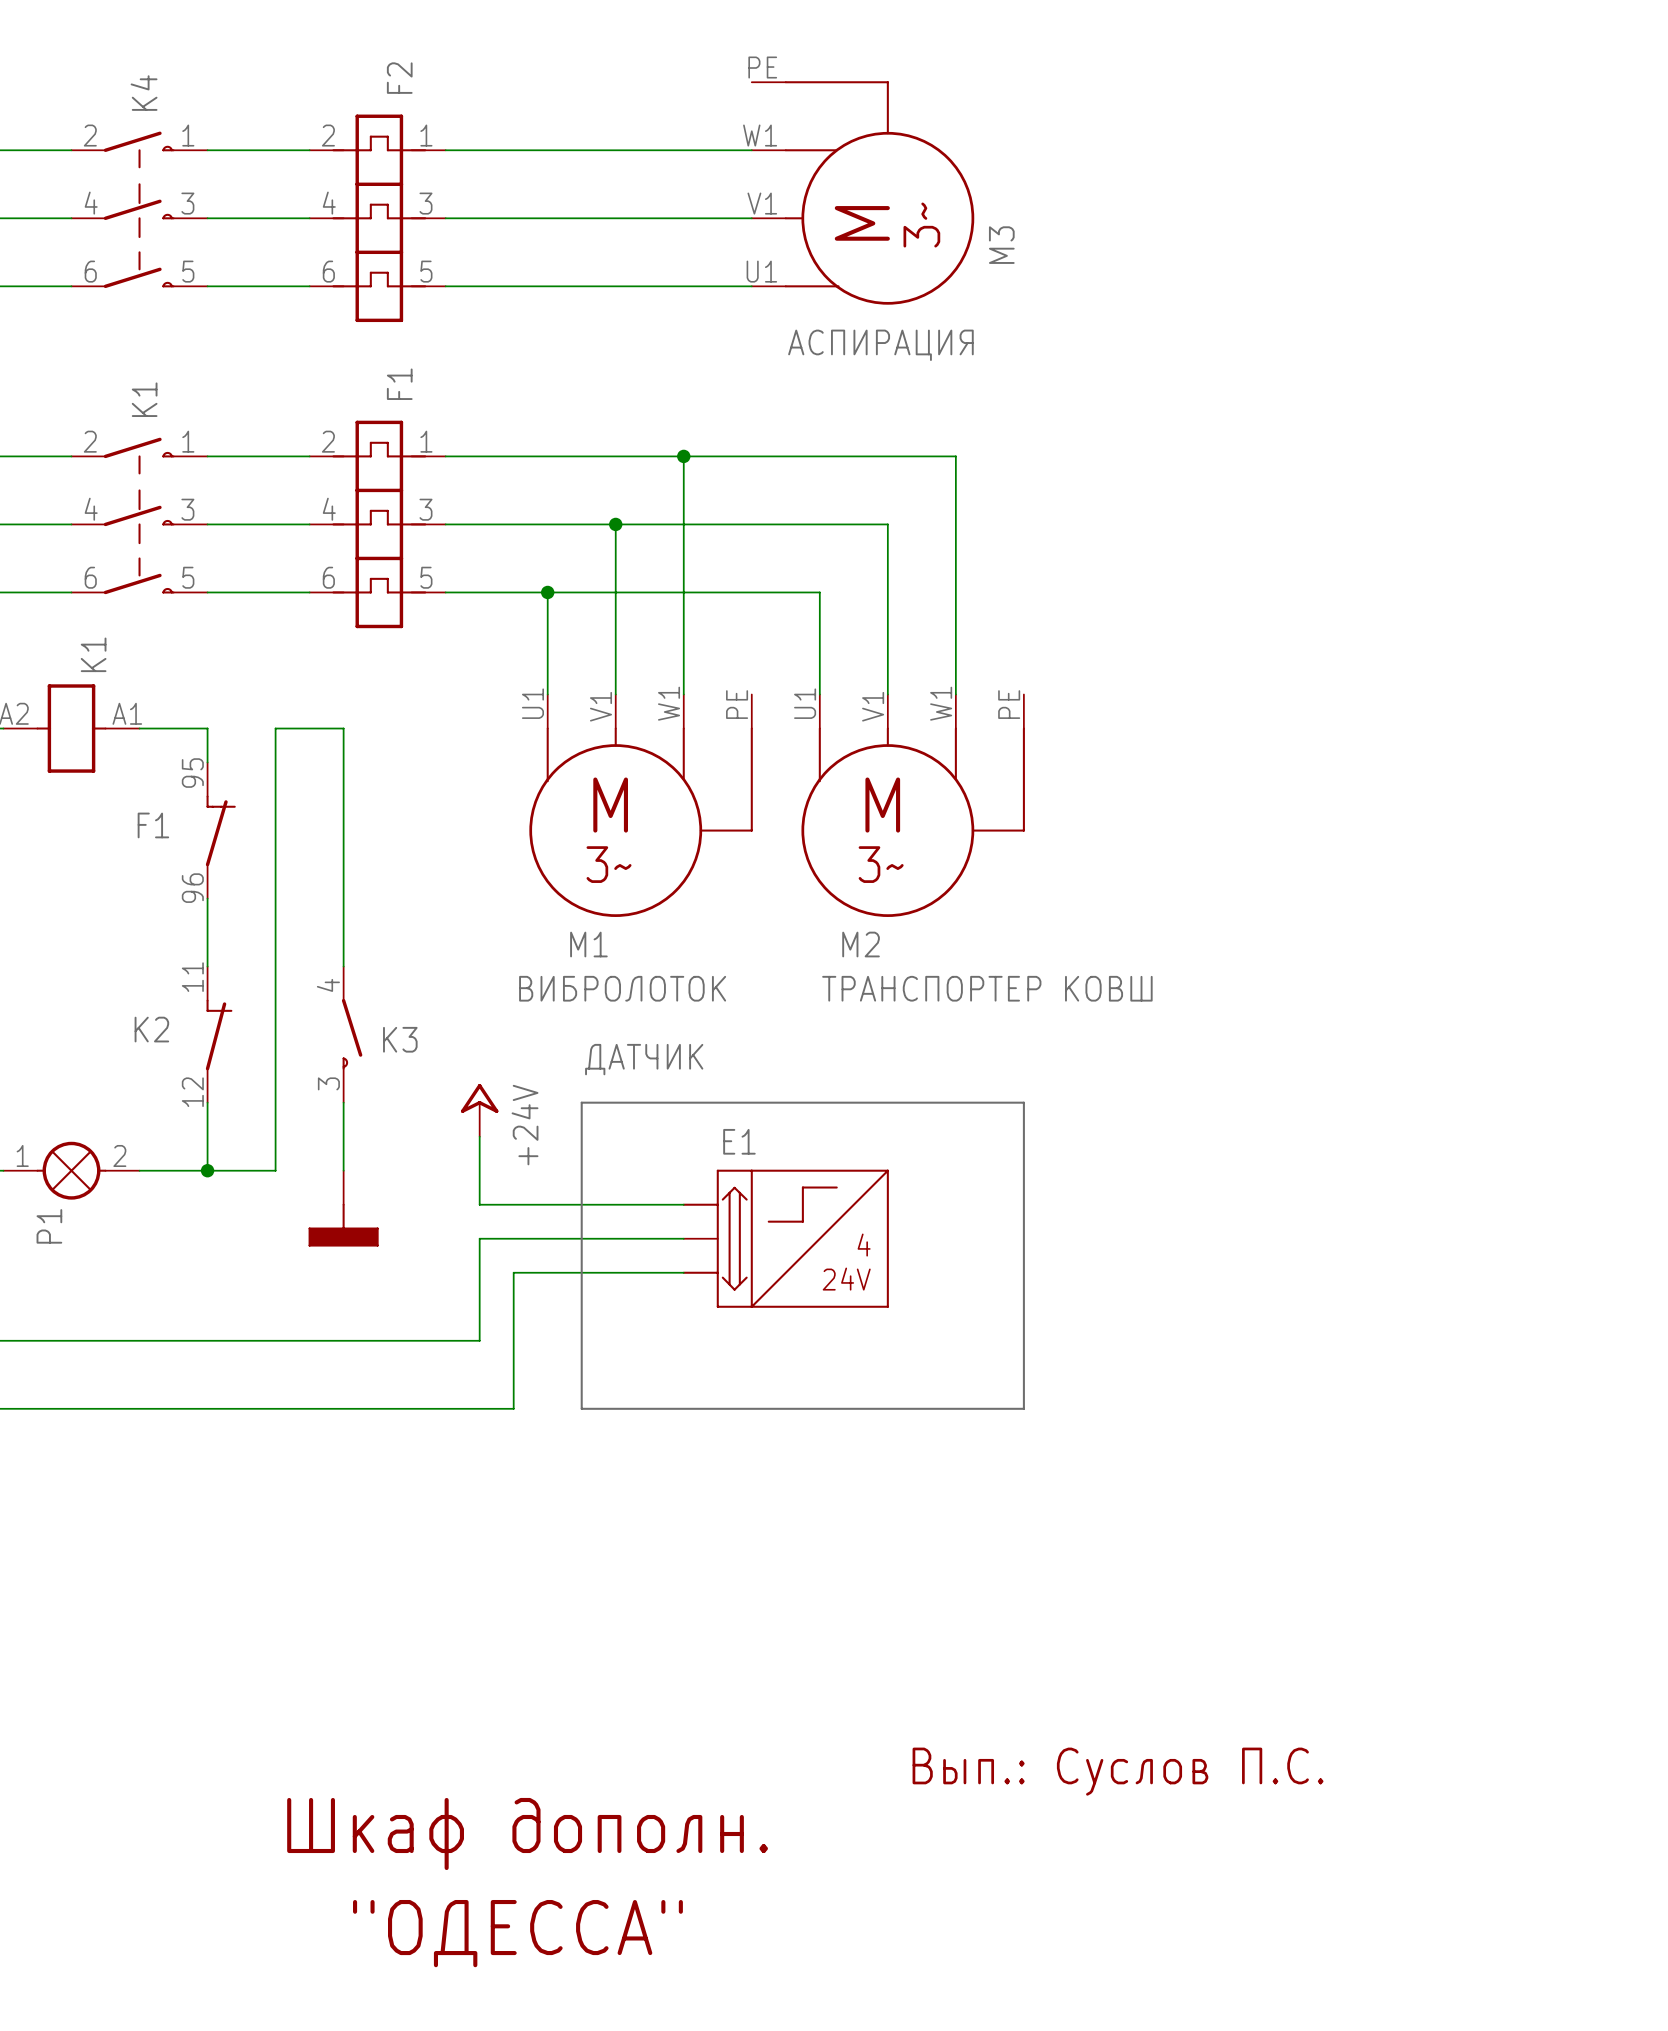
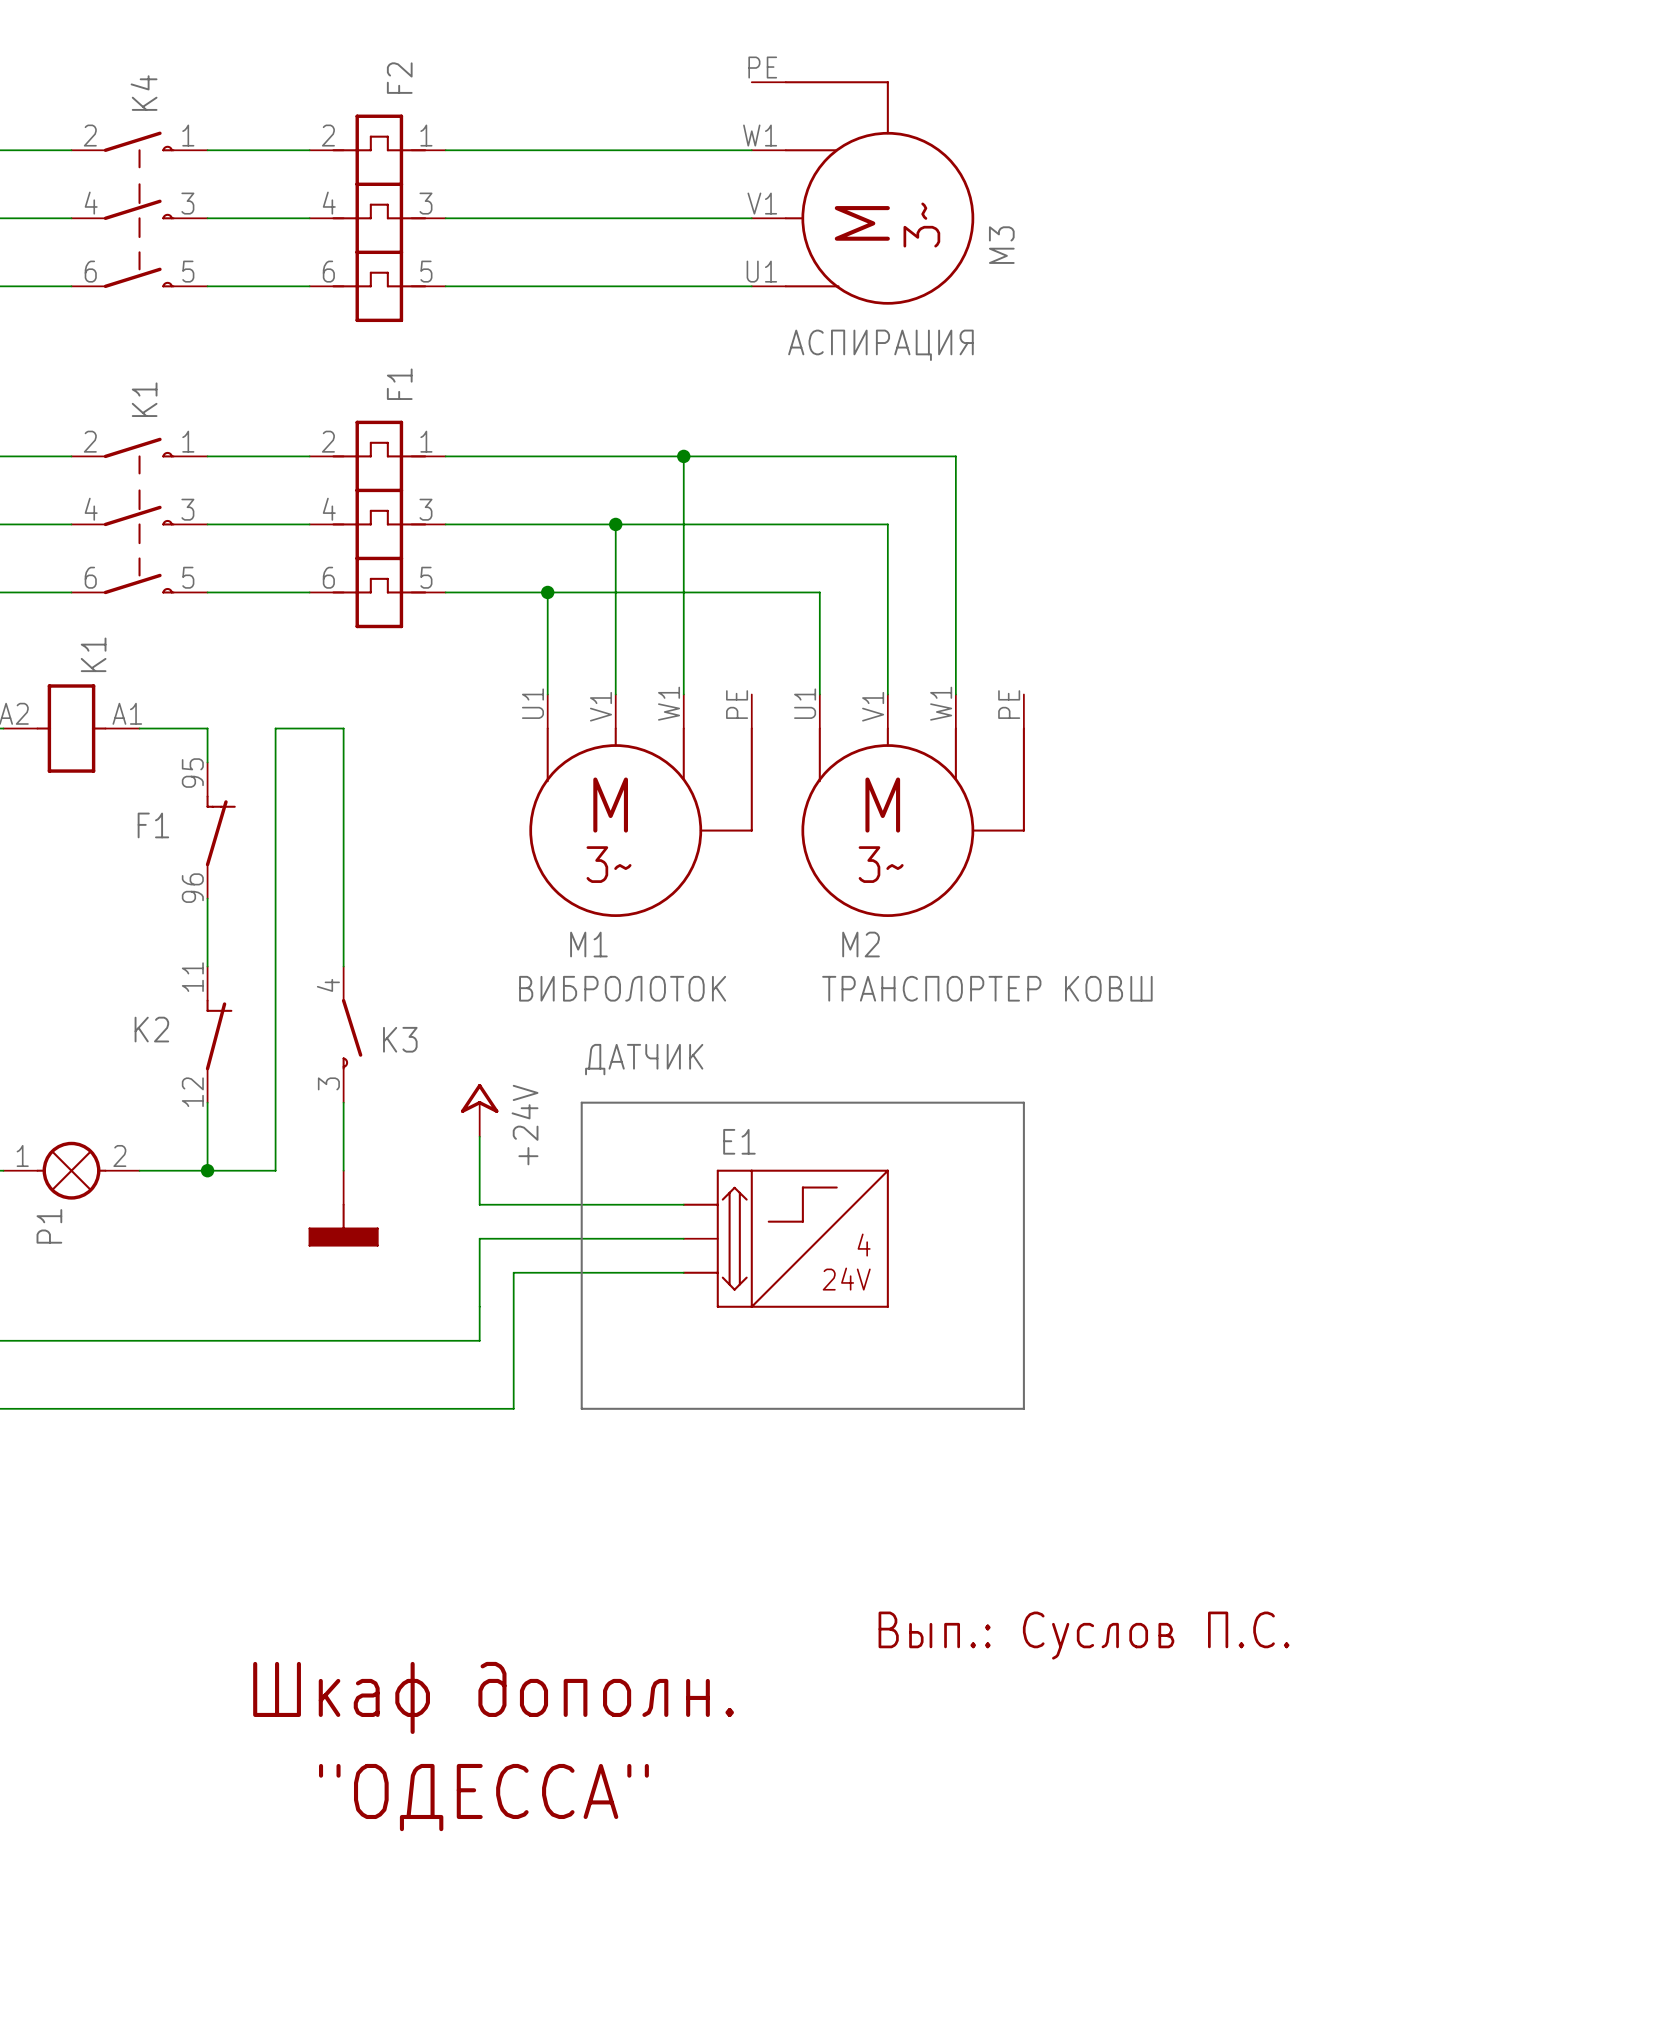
text position: Вып.: Суслов П.С. (1118, 1771) -> Вып.: Суслов П.С. (1084, 1635)
text position: Шкаф дополн. (527, 1833) -> Шкаф дополн. (493, 1697)
text position: "ОДЕССА" (517, 1933) -> "ОДЕССА" (483, 1797)

